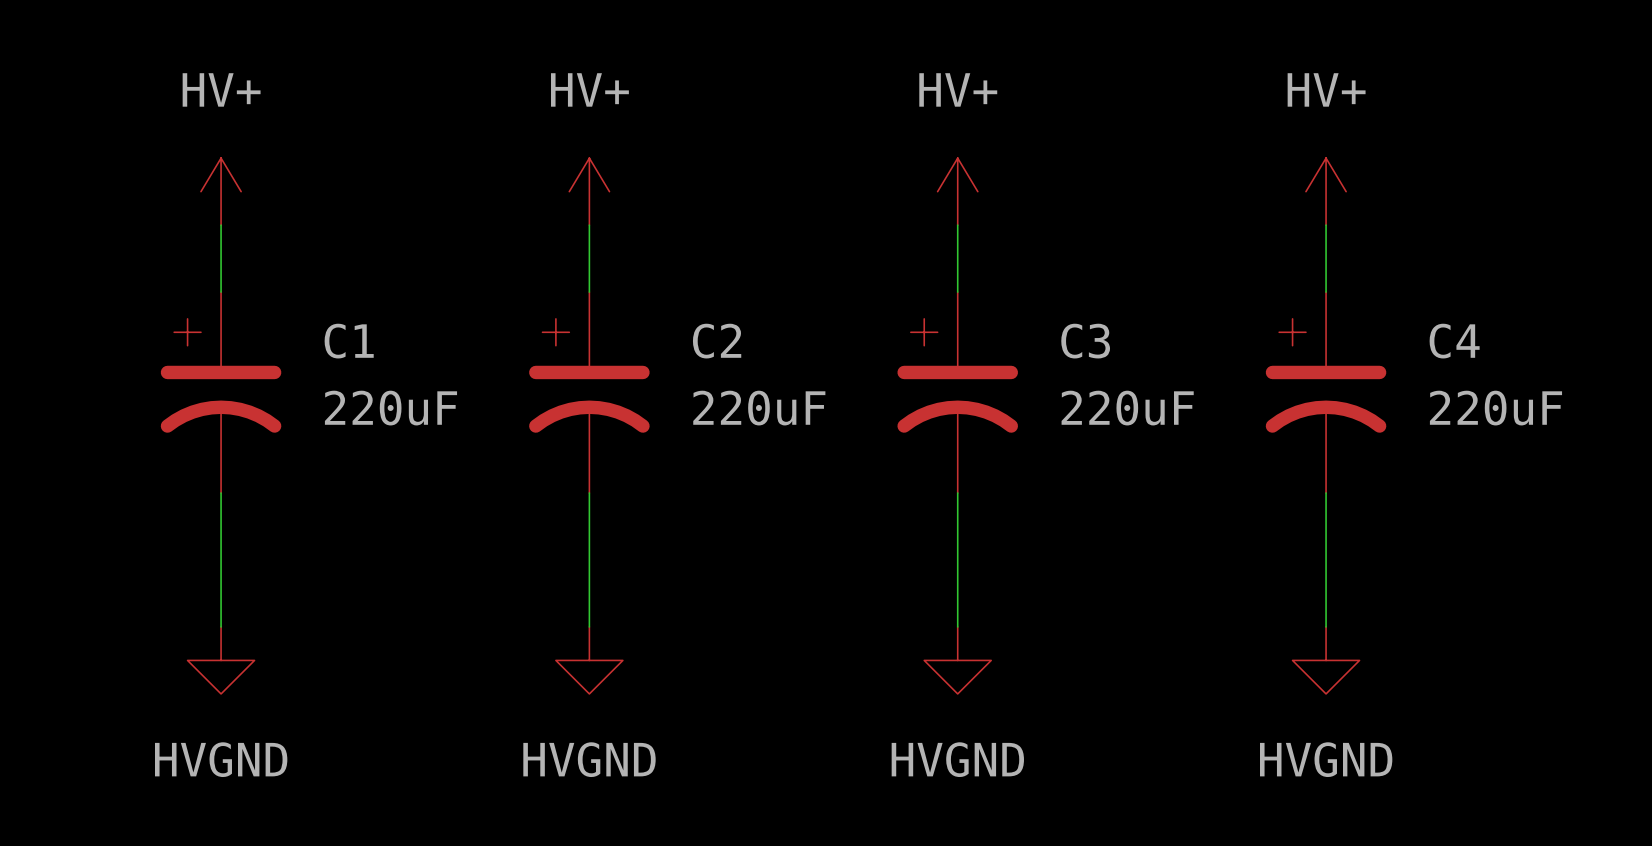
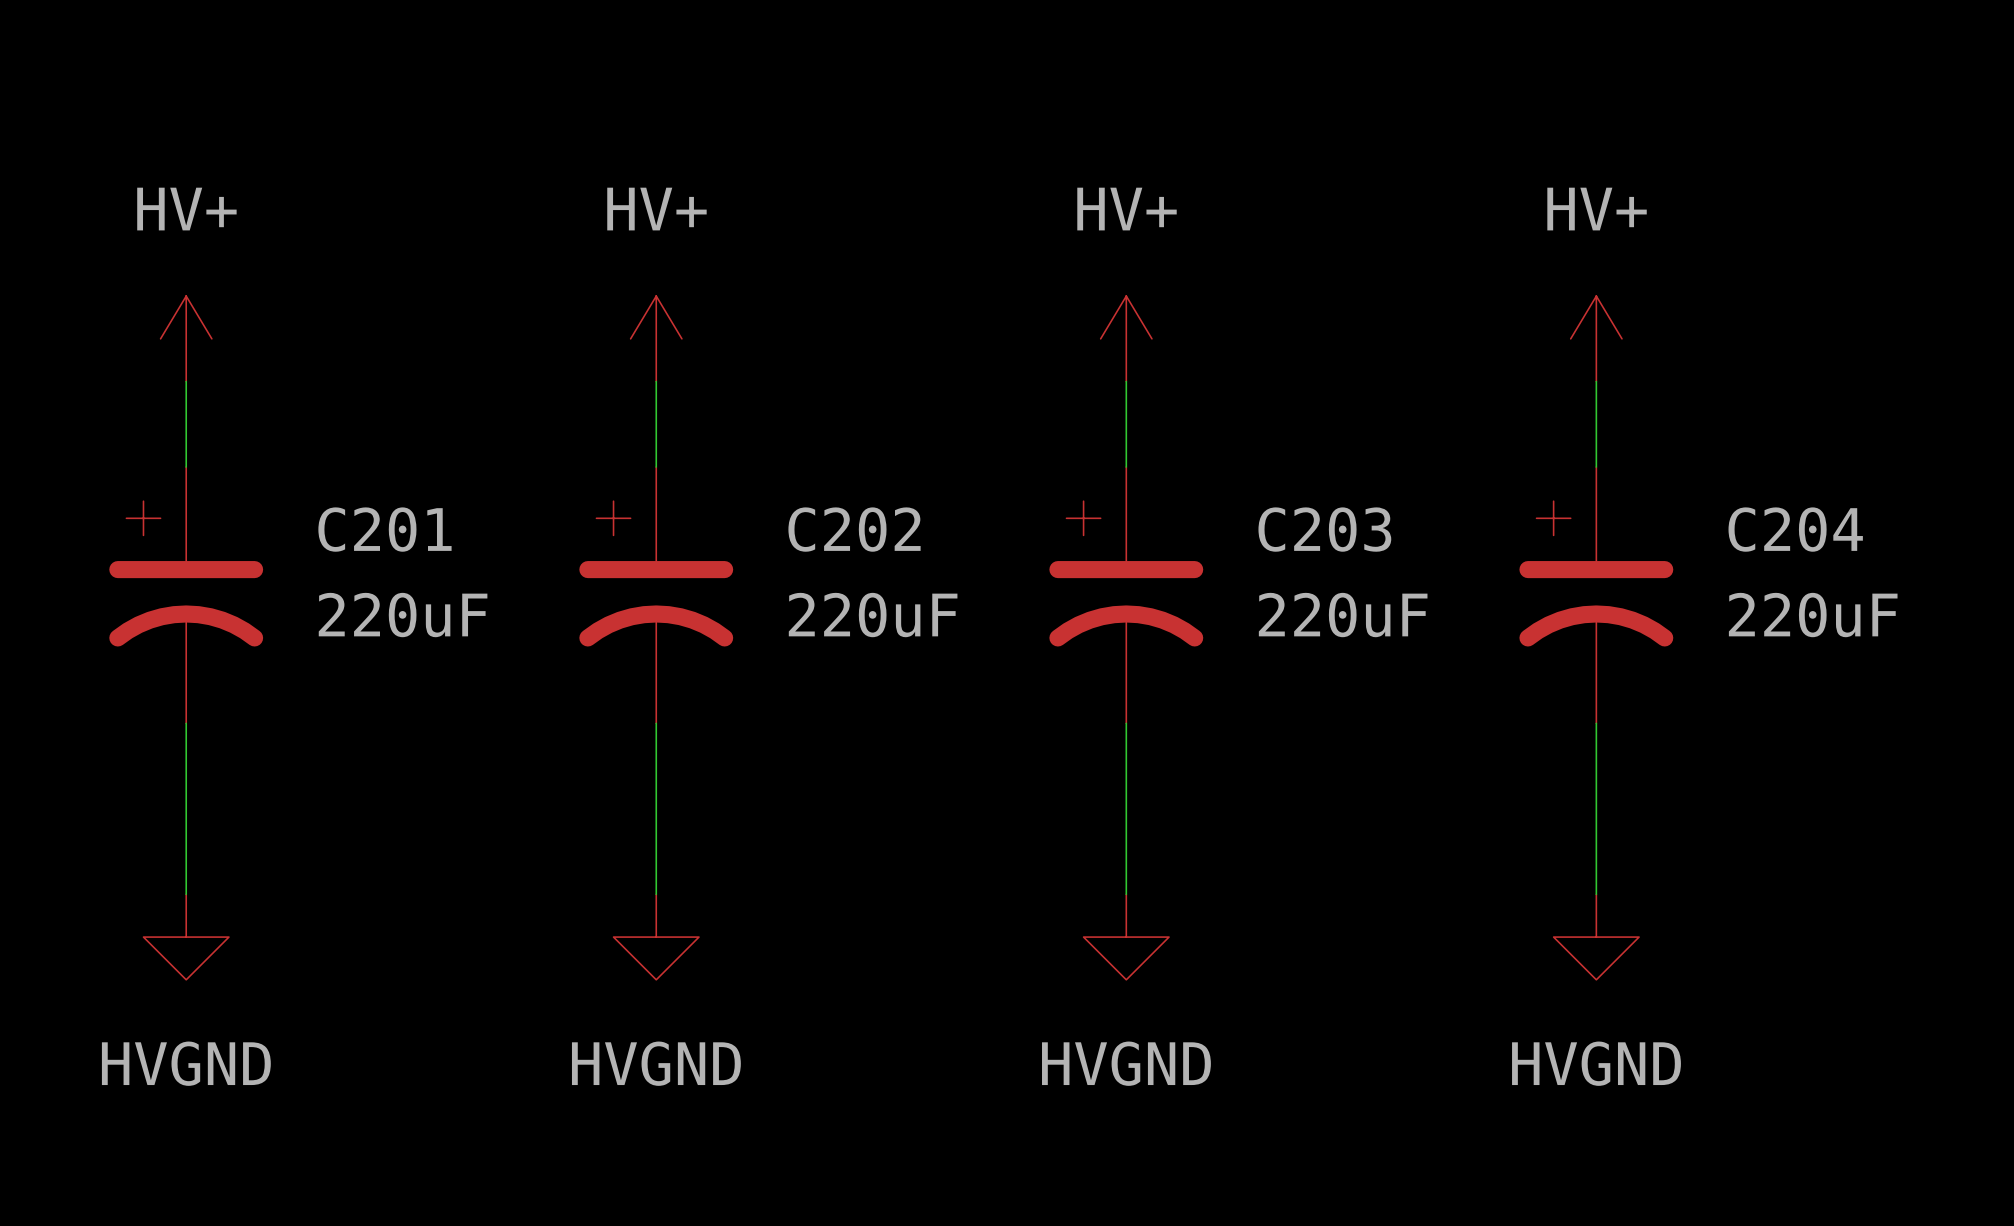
C1 name: C1 (349, 341) -> C201 (384, 529)
C2 name: C2 (717, 341) -> C202 (854, 529)
C3 name: C3 (1085, 341) -> C203 (1324, 529)
C4 name: C4 (1454, 341) -> C204 (1795, 529)

